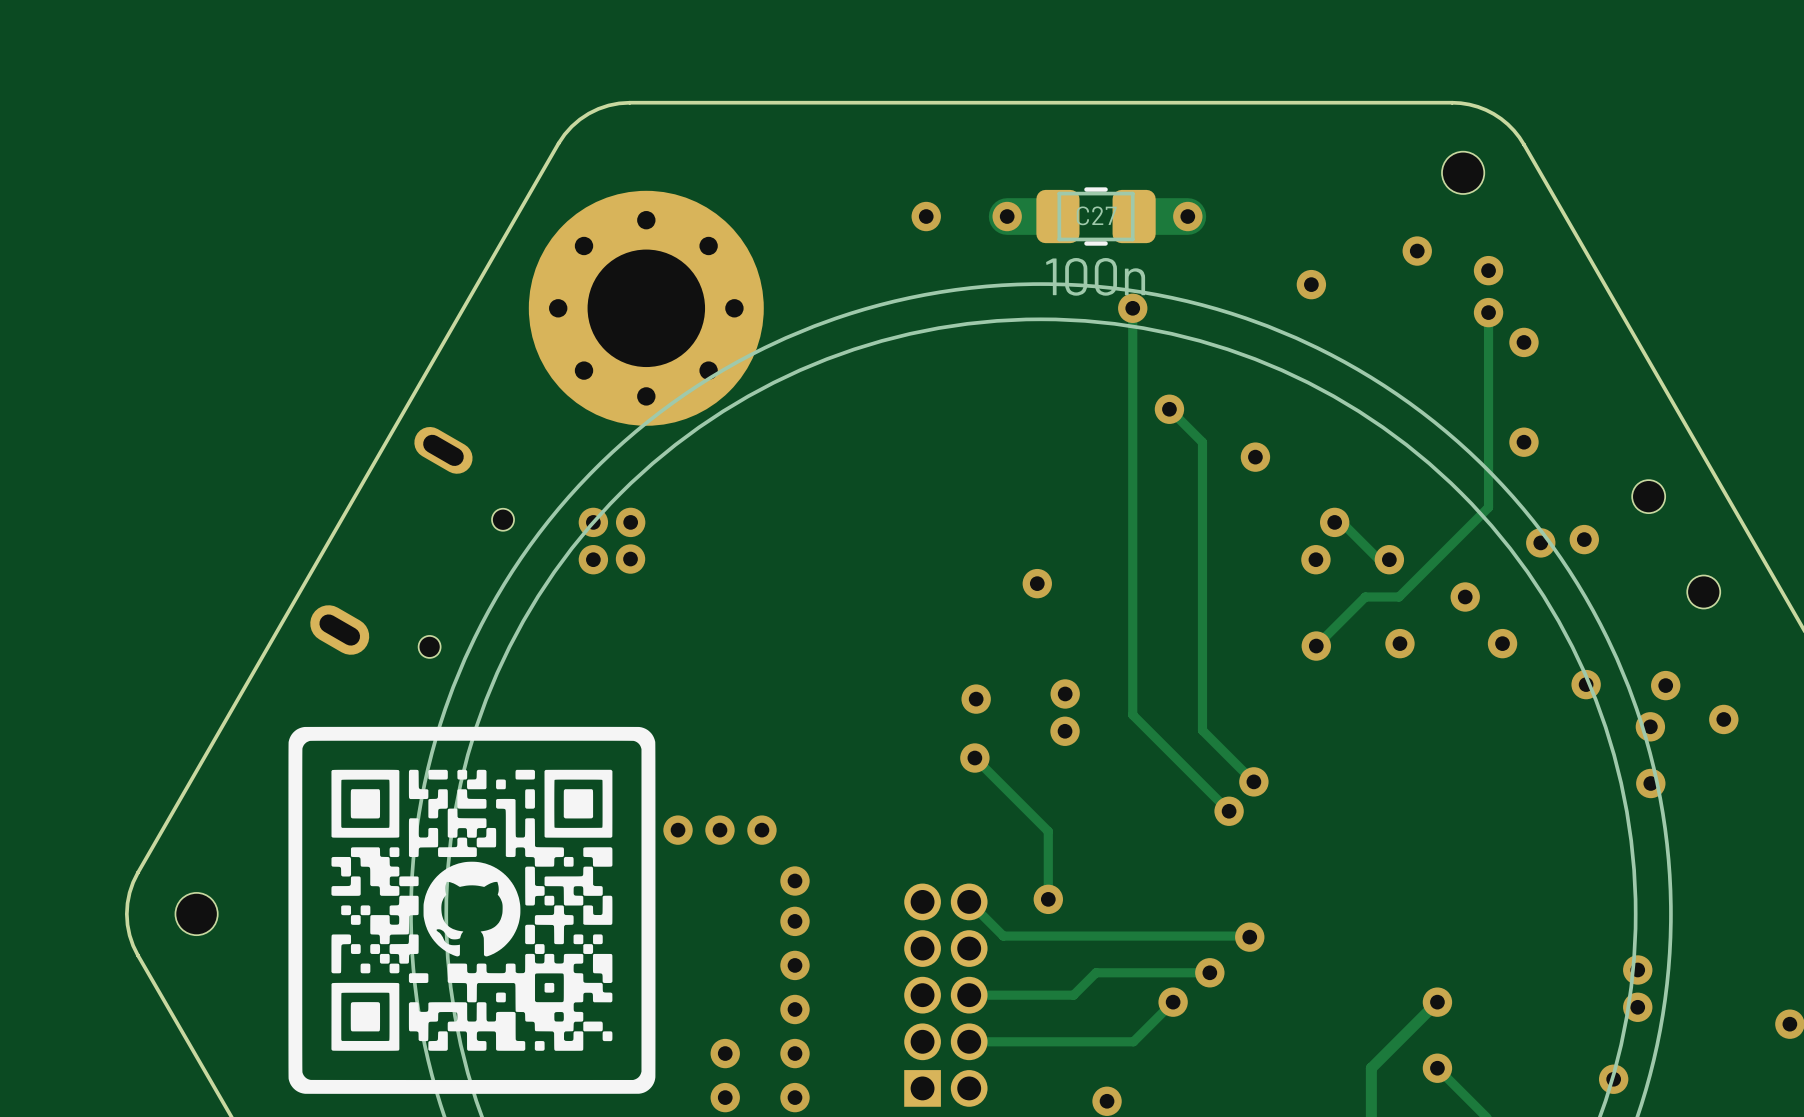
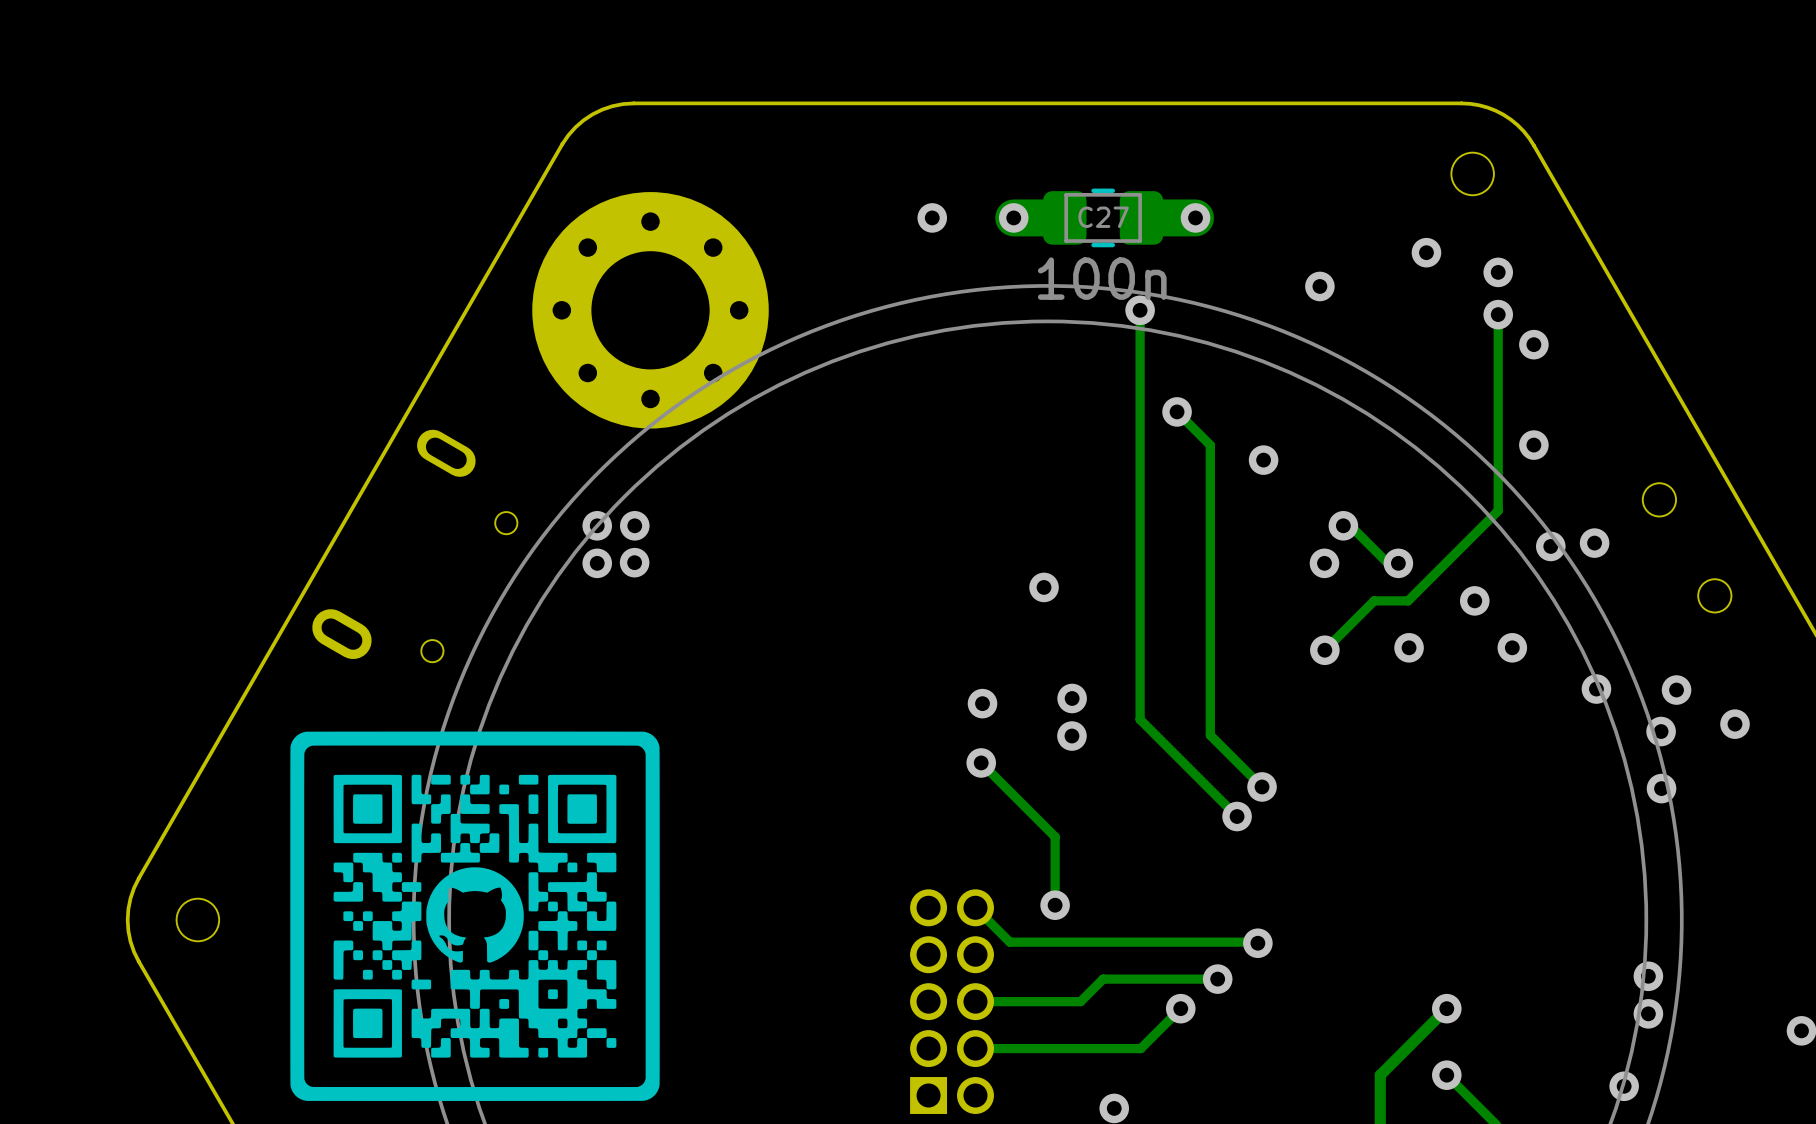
via: (678, 830) -> none
via: (719, 830) -> none
via: (761, 830) -> none
via: (794, 881) -> none
via: (794, 921) -> none
via: (794, 965) -> none
via: (794, 1009) -> none
via: (725, 1053) -> none
via: (794, 1053) -> none
via: (725, 1097) -> none
via: (794, 1097) -> none

